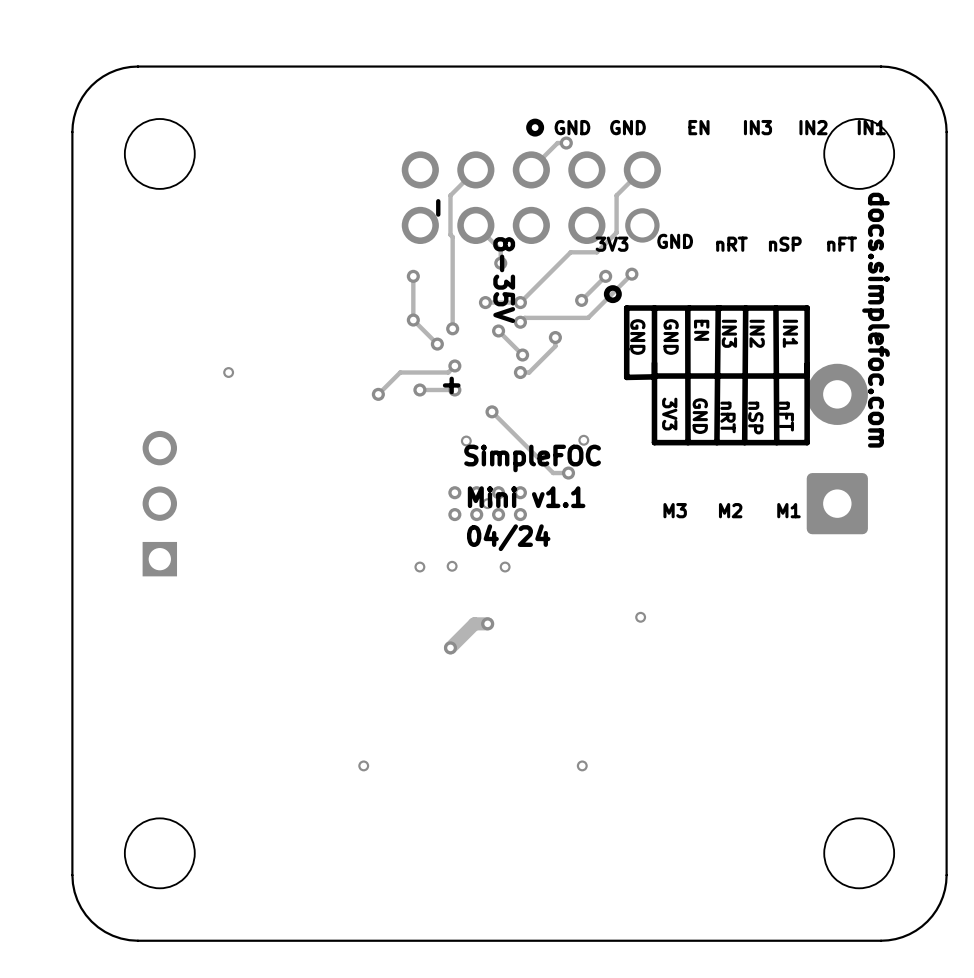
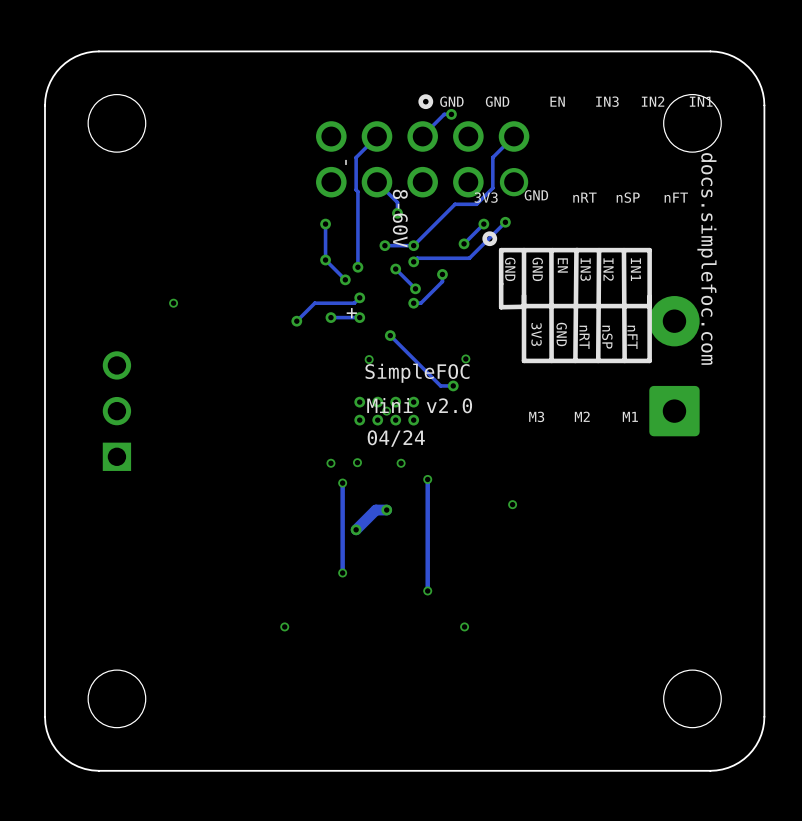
text: 8-35V (504, 280) -> 8-60V (400, 218)
text: Mini v1.1 (526, 497) -> Mini v2.0 (419, 405)
track: none -> (427, 479) (427, 590)
via: none -> (427, 479)
track: none -> (342, 483) (342, 572)
via: none -> (342, 483)
via: none -> (342, 572)
via: none -> (427, 590)

